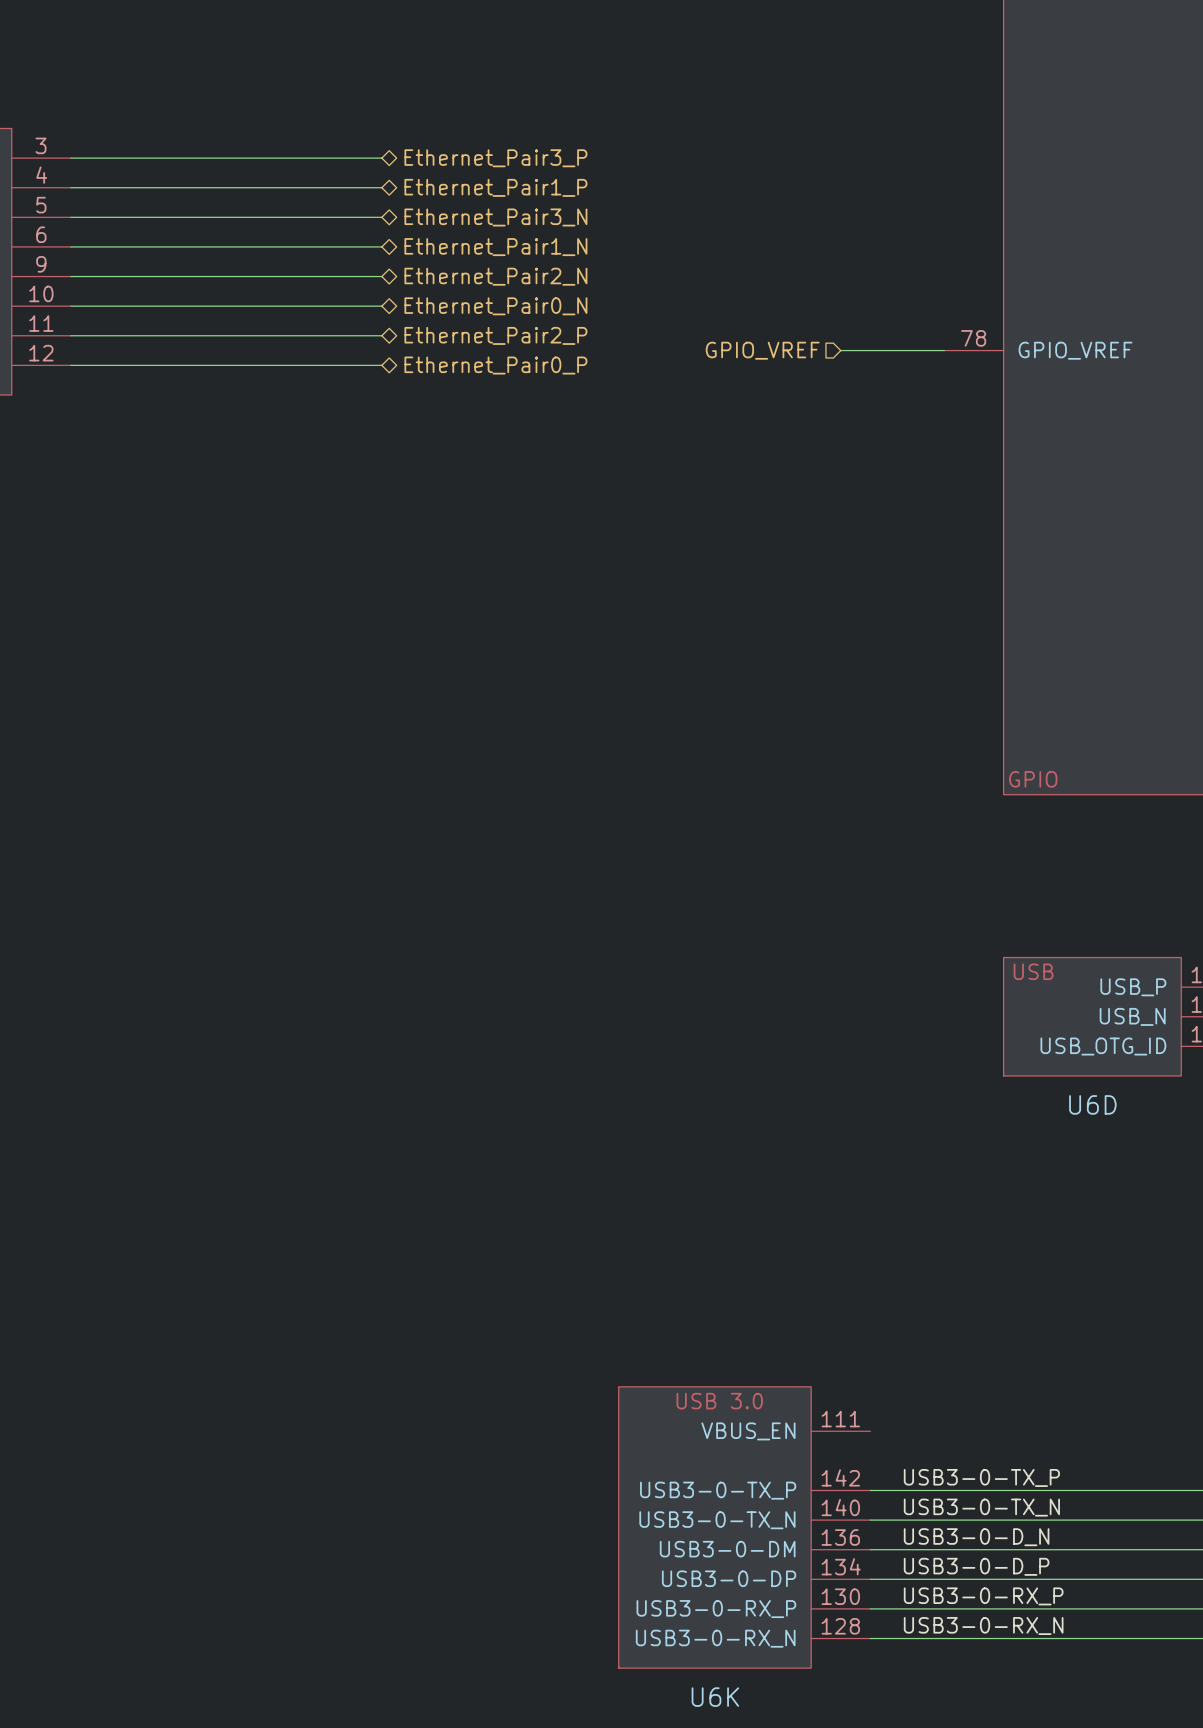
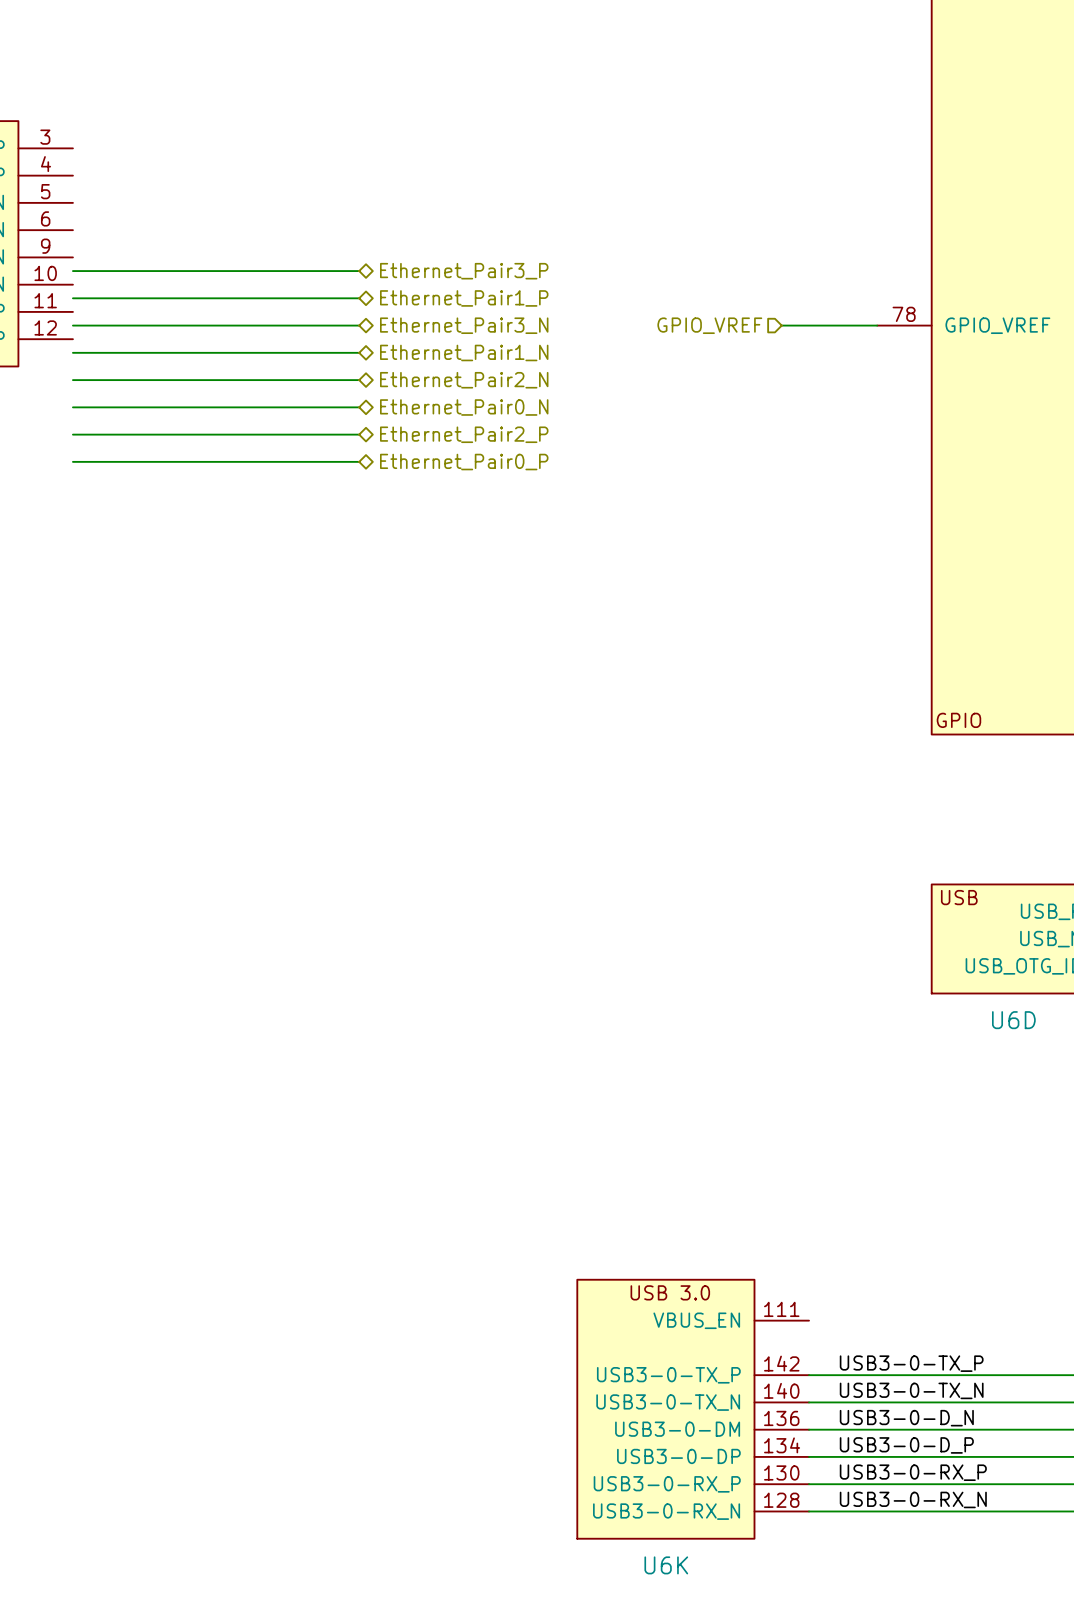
wire: (70, 158) (381, 158) -> (72, 271) (359, 271)
hierarchical label position: Ethernet_Pair3_P (495, 158) -> Ethernet_Pair3_P (464, 271)
wire: (70, 187) (381, 187) -> (72, 298) (359, 298)
hierarchical label position: Ethernet_Pair1_P (495, 187) -> Ethernet_Pair1_P (464, 298)
wire: (70, 217) (381, 217) -> (72, 325) (359, 325)
hierarchical label position: Ethernet_Pair3_N (495, 217) -> Ethernet_Pair3_N (464, 325)
wire: (70, 246) (381, 246) -> (72, 352) (359, 352)
hierarchical label position: Ethernet_Pair1_N (495, 247) -> Ethernet_Pair1_N (464, 352)
wire: (70, 276) (381, 276) -> (72, 380) (359, 380)
hierarchical label position: Ethernet_Pair2_N (495, 276) -> Ethernet_Pair2_N (464, 380)
wire: (70, 306) (381, 306) -> (72, 407) (359, 407)
hierarchical label position: Ethernet_Pair0_N (495, 306) -> Ethernet_Pair0_N (464, 407)
wire: (70, 335) (381, 335) -> (72, 434) (359, 434)
hierarchical label position: Ethernet_Pair2_P (495, 335) -> Ethernet_Pair2_P (464, 434)
wire: (70, 365) (381, 365) -> (72, 461) (359, 461)
hierarchical label position: Ethernet_Pair0_P (495, 365) -> Ethernet_Pair0_P (464, 462)

